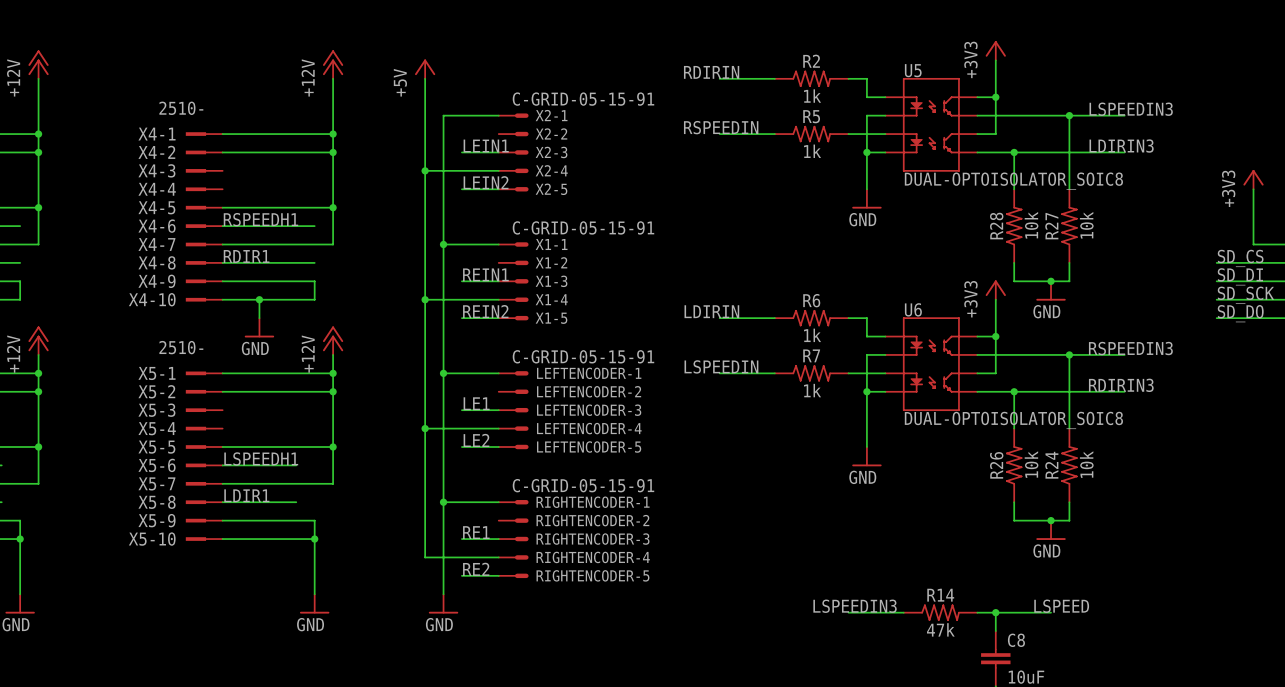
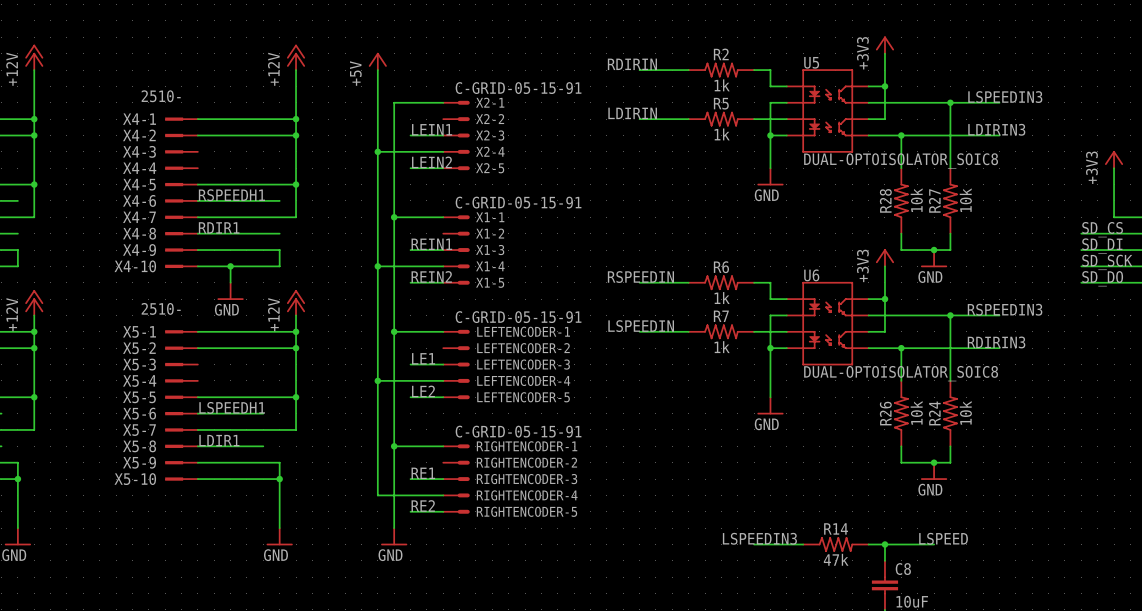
label: RSPEEDIN (721, 127) -> LDIRIN (632, 113)
label: LDIRIN (711, 311) -> RSPEEDIN (640, 277)

